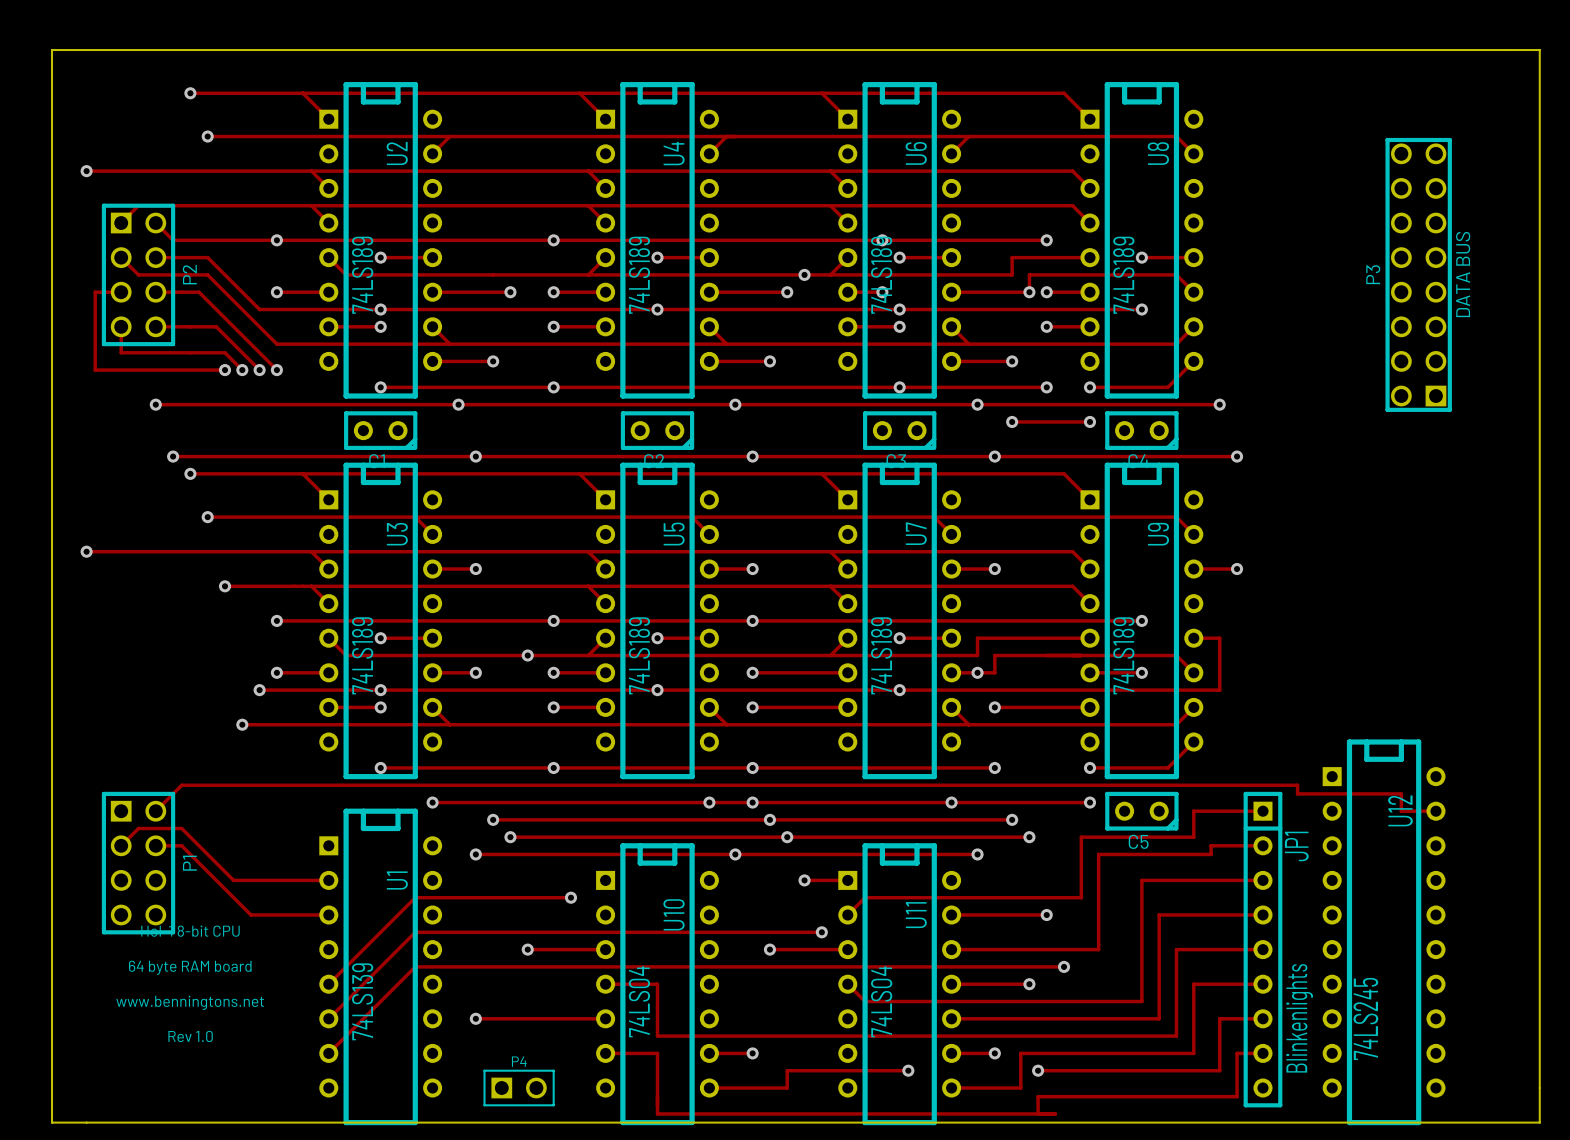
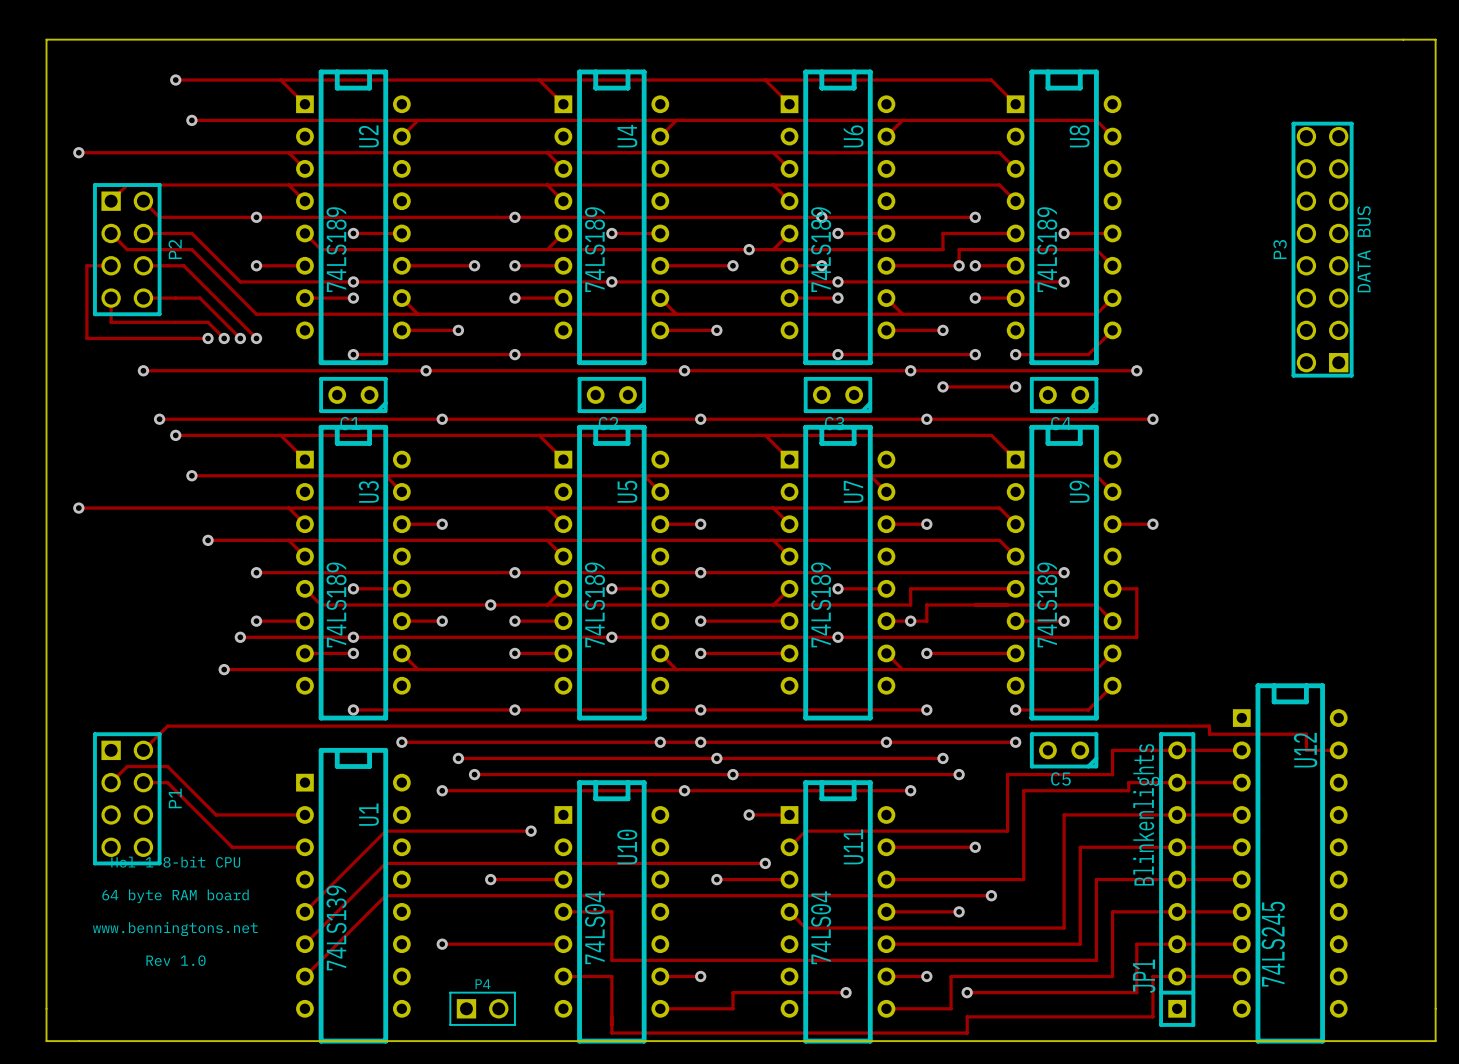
track: none -> (1177, 750) (1241, 750)
track: none -> (1177, 782) (1241, 782)
track: none -> (1177, 814) (1241, 814)
track: none -> (1177, 847) (1241, 847)
track: none -> (1177, 879) (1241, 879)
JP1 rotation: 0° (1262, 949) -> 180° (1177, 879)
track: none -> (1177, 911) (1241, 911)
track: none -> (1177, 944) (1241, 944)
track: none -> (1177, 976) (1241, 976)
track: (1038, 1113) (1055, 1113) -> none

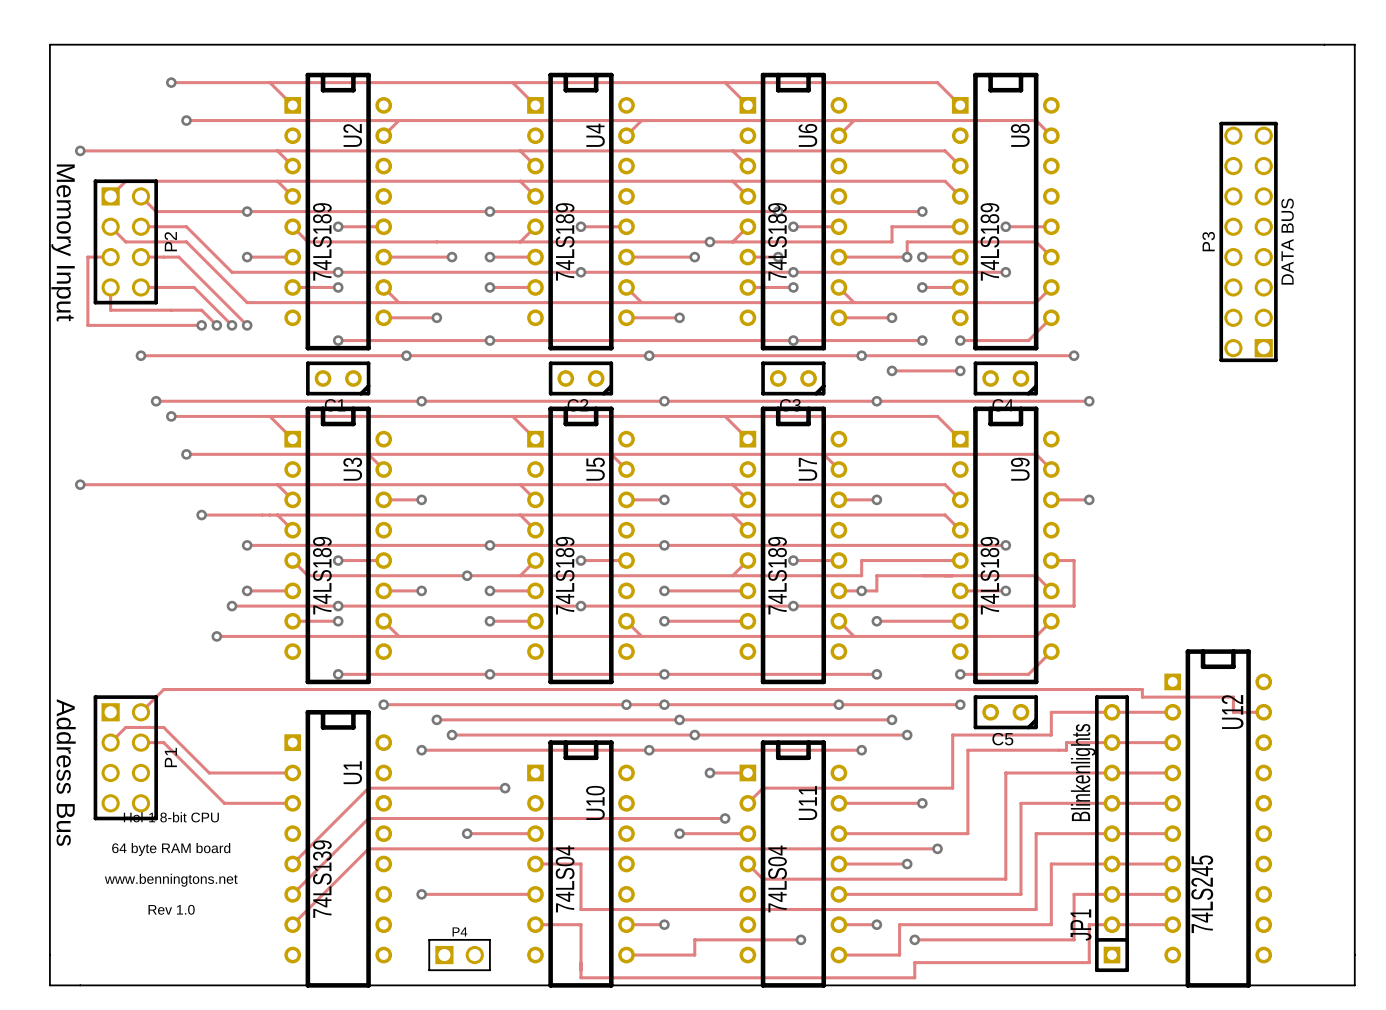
text: none -> Memory Input (63, 242)
text: none -> Address Bus (66, 772)

